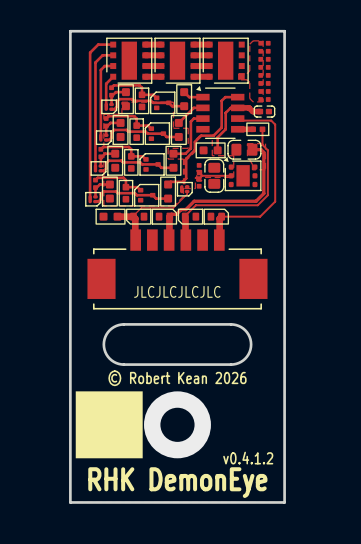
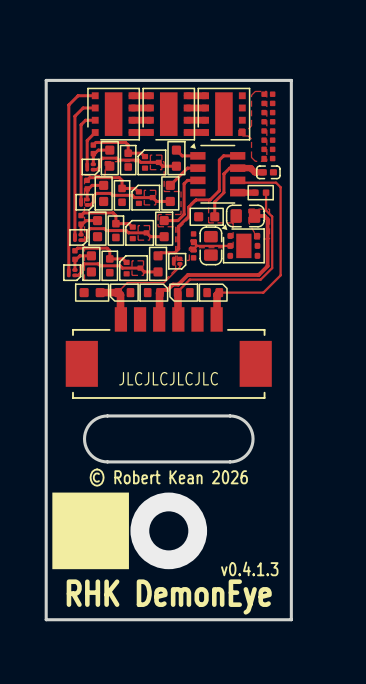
zone outline: none -> (150, 155) (161, 155) (161, 169) (150, 169) (150, 155)
zone outline: none -> (144, 190) (155, 190) (155, 204) (144, 204) (144, 190)
zone outline: none -> (138, 225) (149, 225) (149, 240) (138, 240) (138, 225)
zone outline: none -> (132, 260) (143, 260) (143, 275) (132, 275) (132, 260)
text: v0.4.1.2 (248, 458) -> v0.4.1.3 (249, 568)

